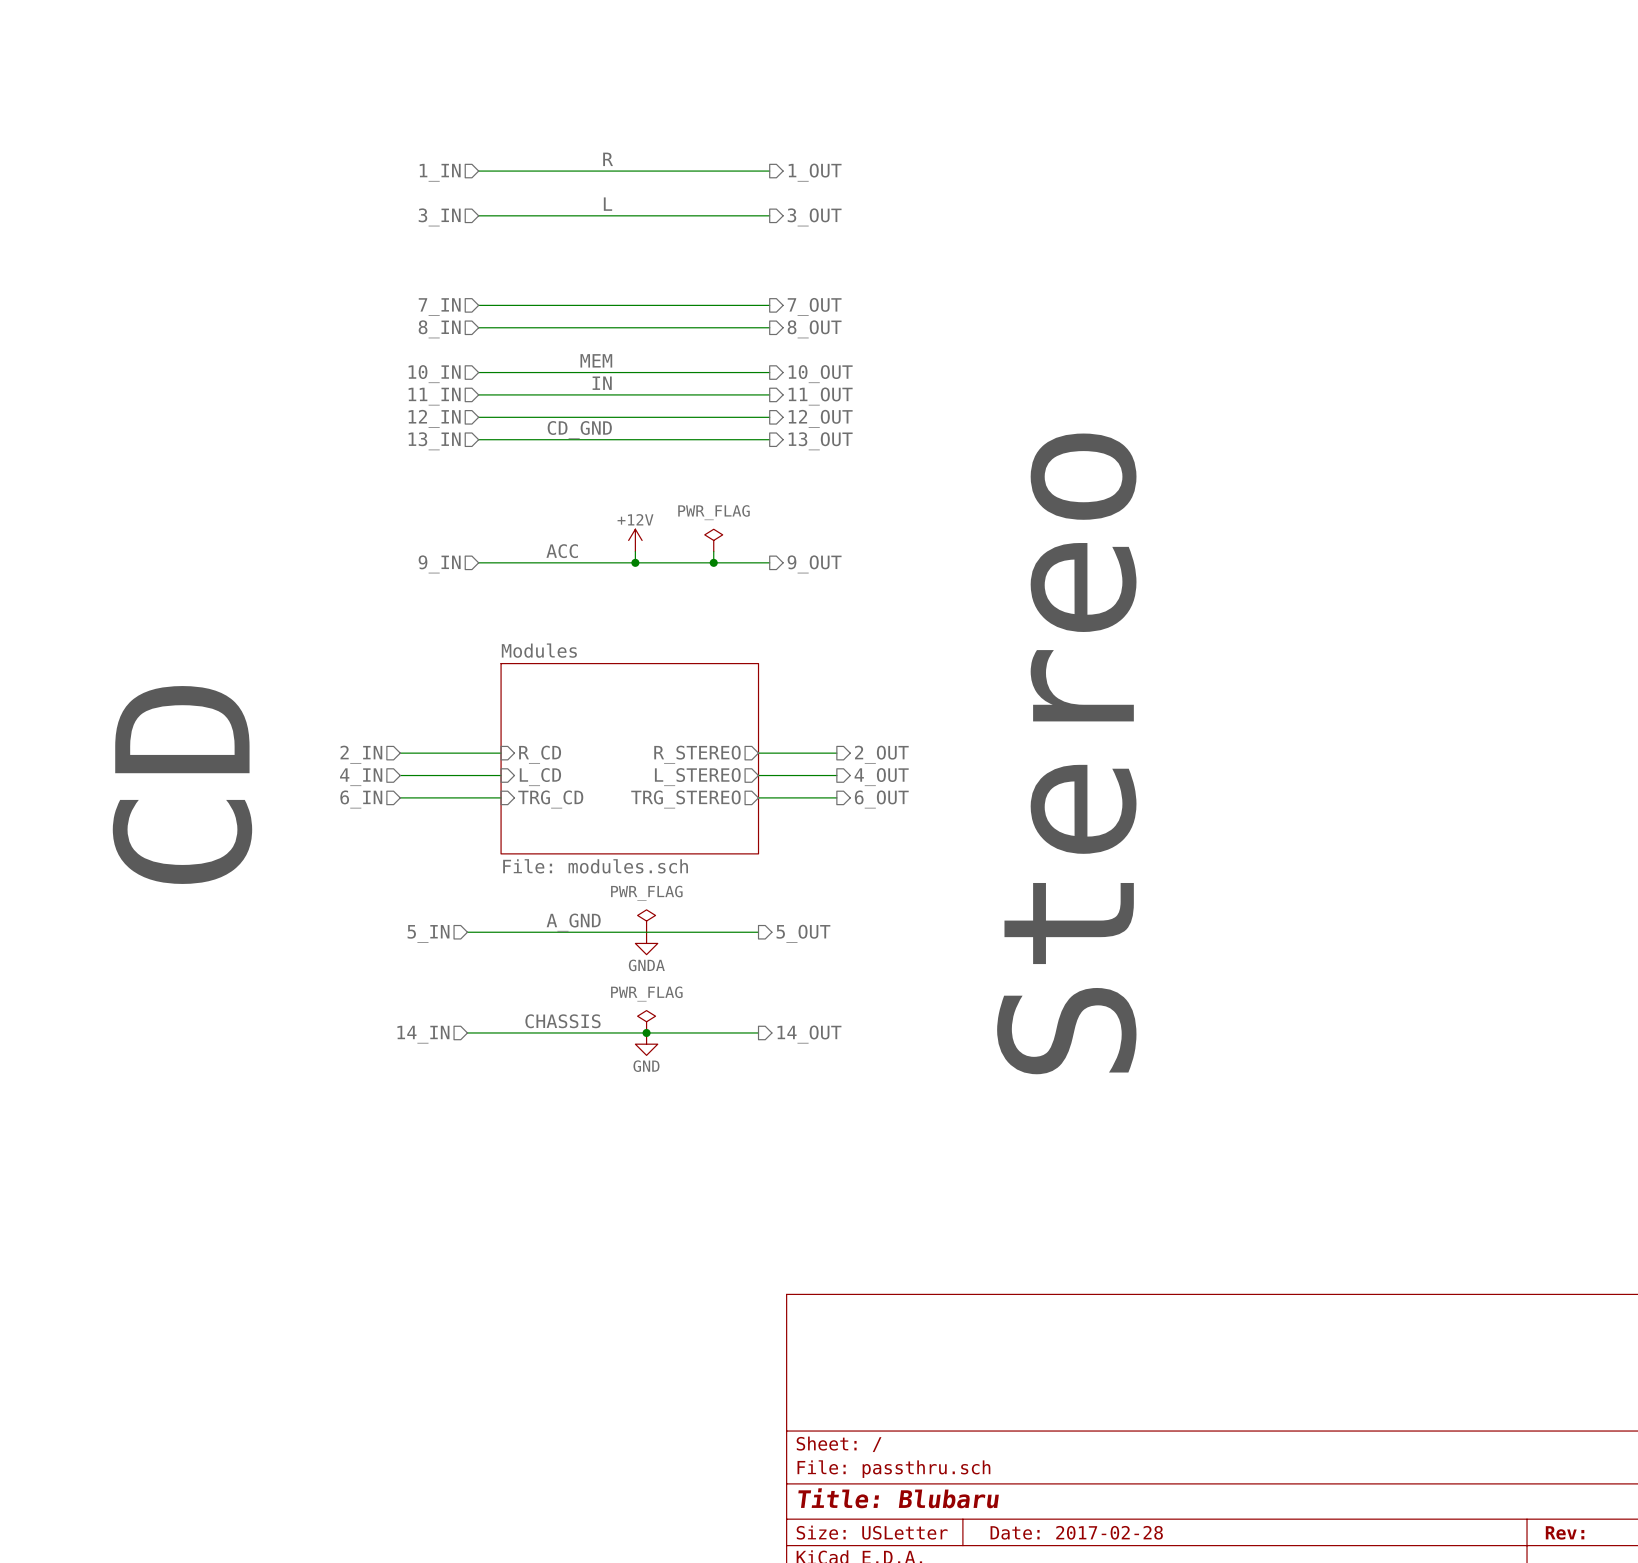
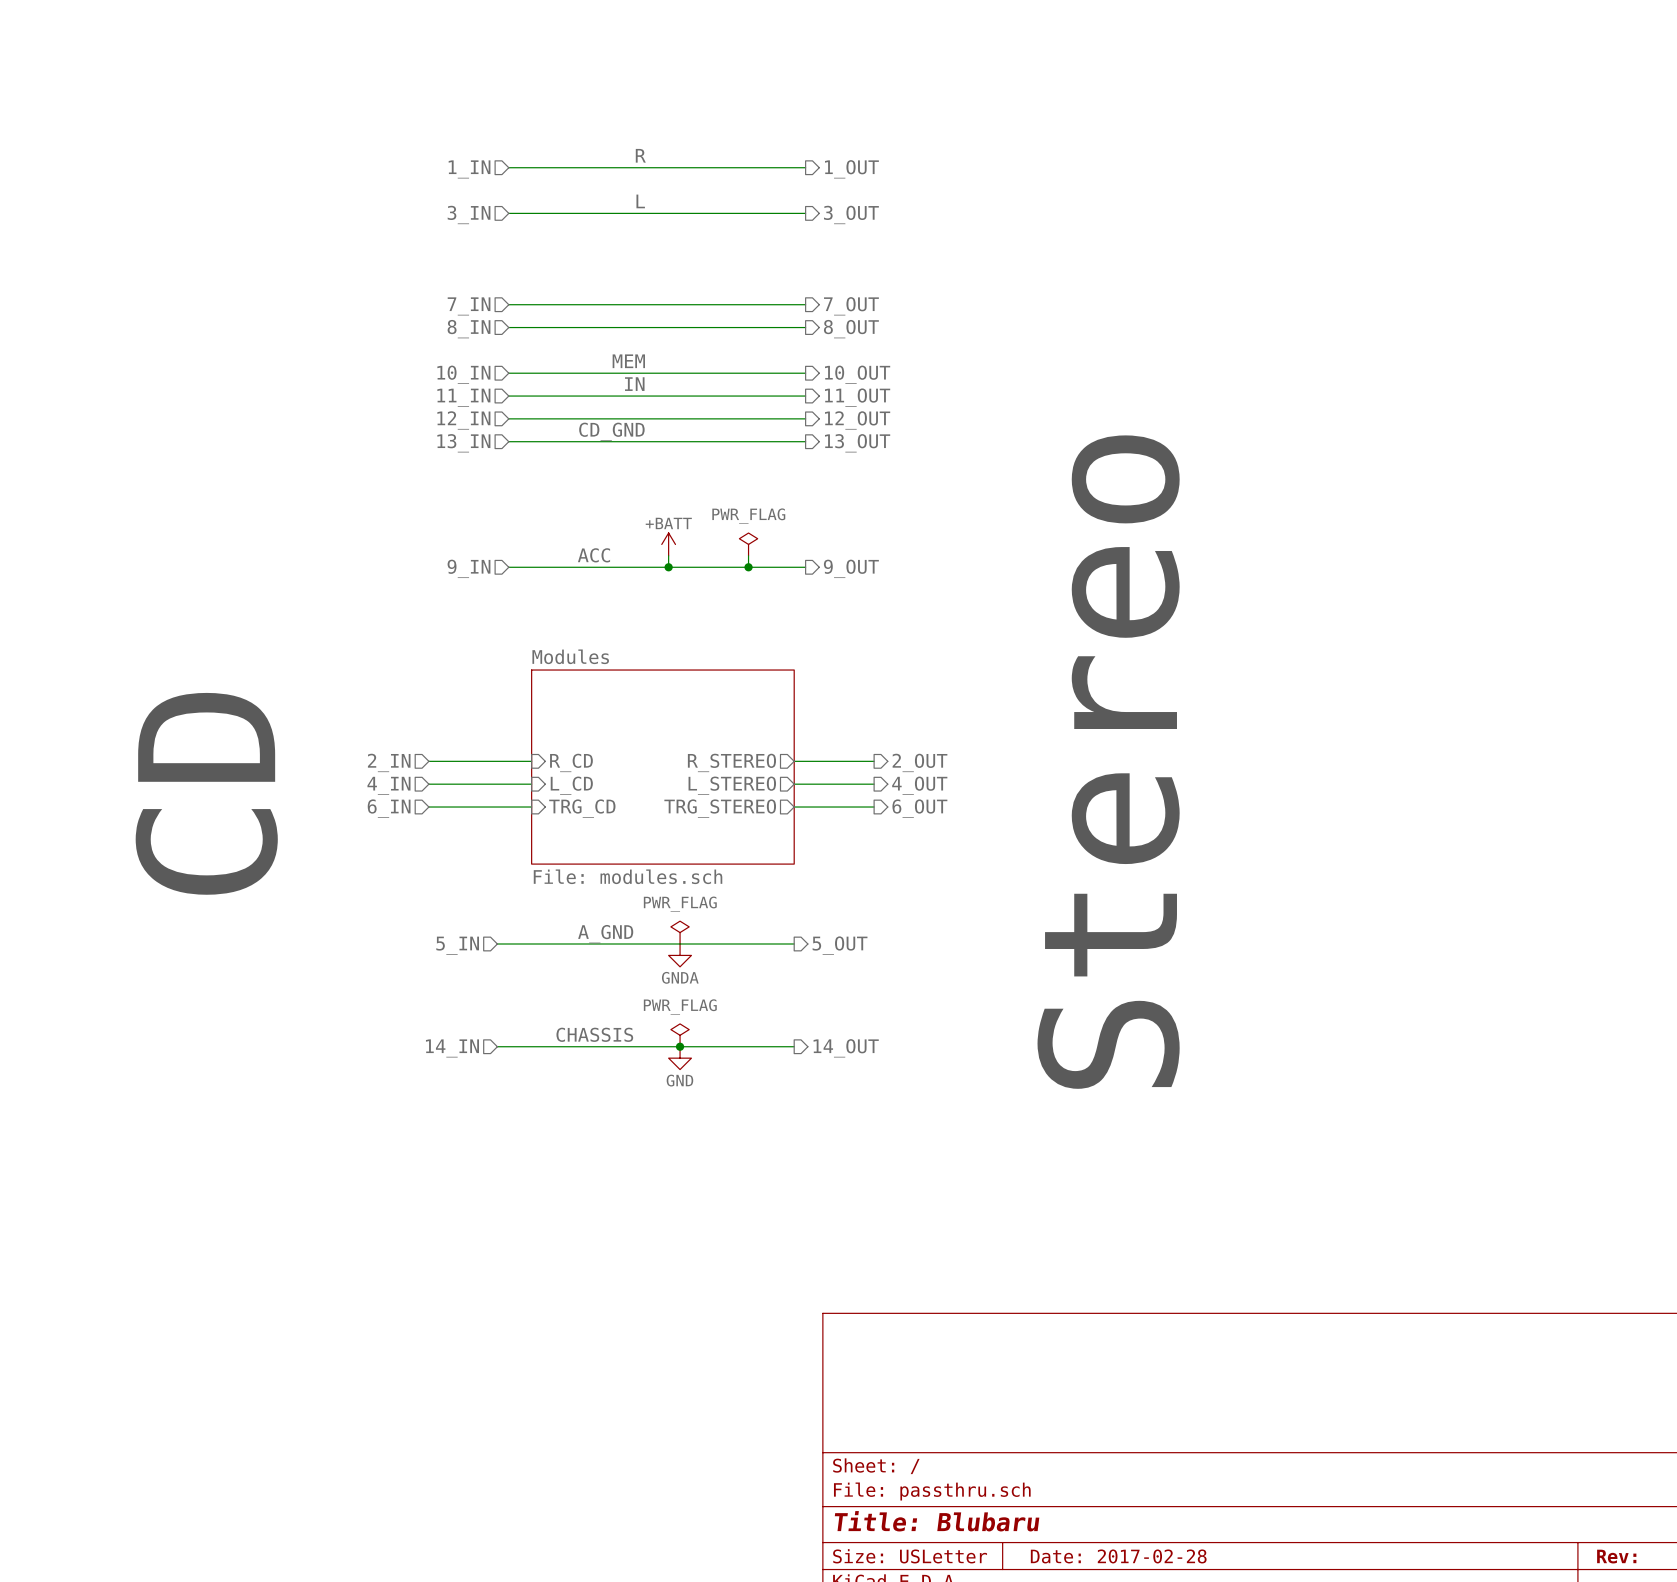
power symbol: +12V (635, 540) -> +BATT (668, 544)

